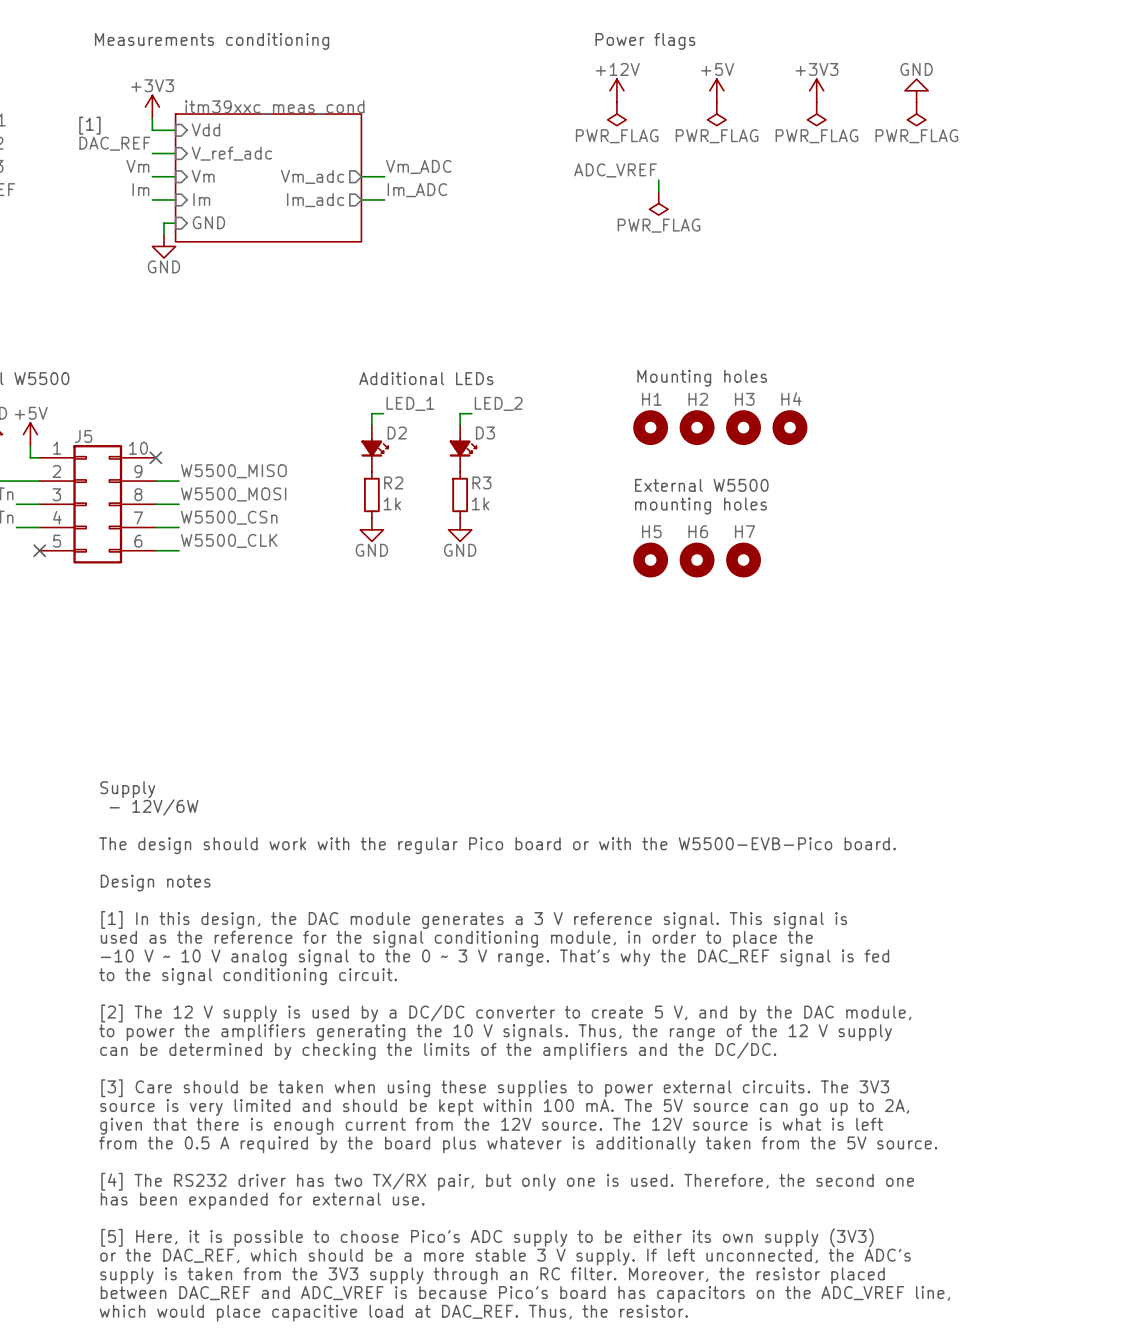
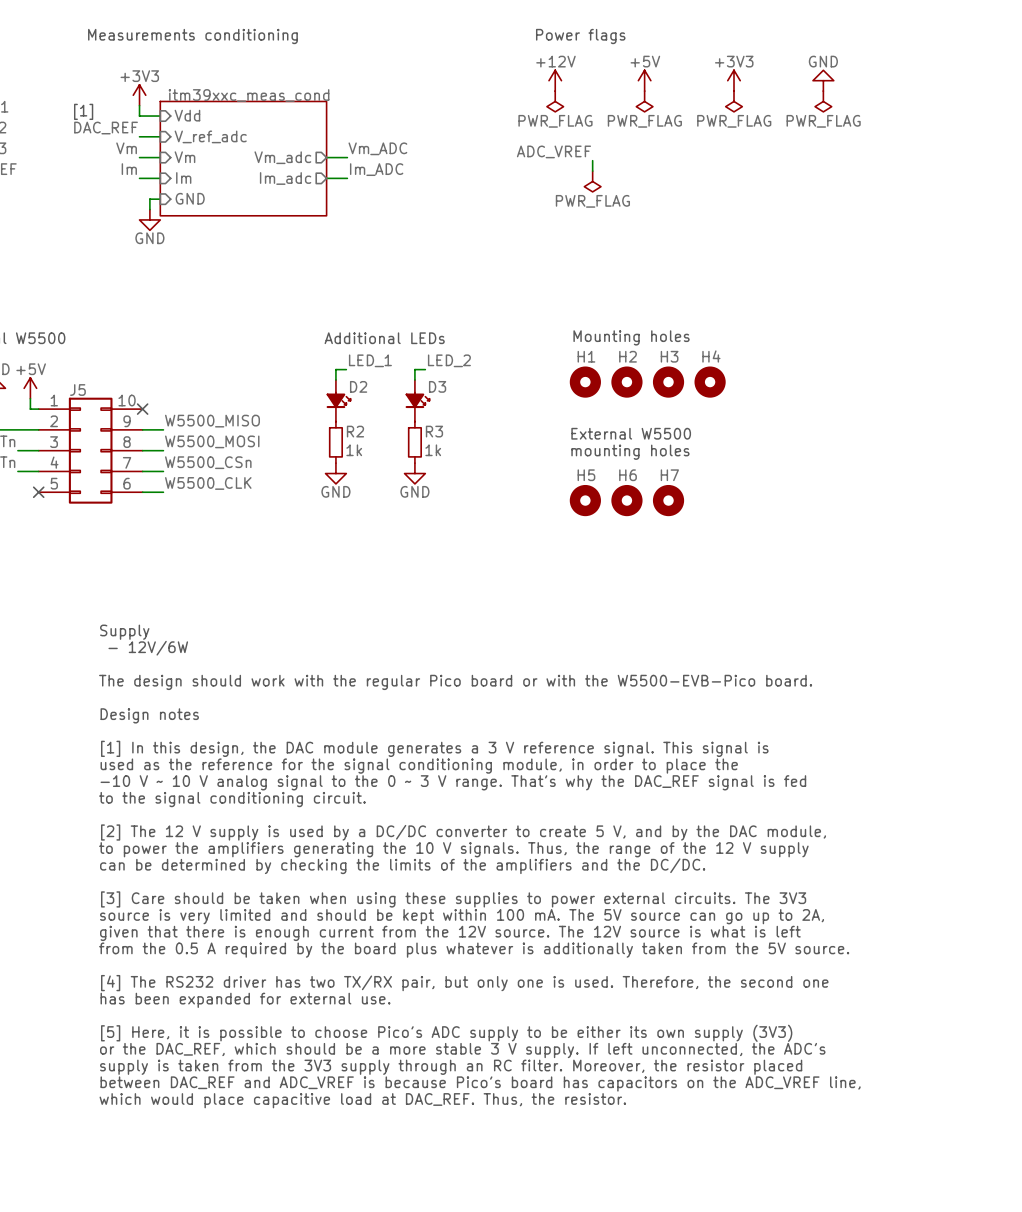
text position: Supply (127, 789) -> Supply (124, 632)
text position: - 12V/6W (154, 807) -> - 12V/6W (148, 648)
text position: The design should work with the regular Pico board or with the W5500-EVB-Pico board. (497, 845) -> The design should work with the regular Pico board or with the W5500-EVB-Pico board. (455, 682)
text position: Design notes (155, 883) -> Design notes (149, 715)
text position: [1] In this design, the DAC module generates a 3 V reference signal. This signal is (474, 919) -> [1] In this design, the DAC module generates a 3 V reference signal. This signal is (434, 748)
text position: used as the reference for the signal conditioning module, in order to place the (456, 939) -> used as the reference for the signal conditioning module, in order to place the (419, 766)
text position: -10 V ~ 10 V analog signal to the 0 ~ 3 V range. That's why the DAC_REF signal is fed (494, 957) -> -10 V ~ 10 V analog signal to the 0 ~ 3 V range. That's why the DAC_REF signal is fed (453, 782)
text position: to the signal conditioning circuit. (248, 976) -> to the signal conditioning circuit. (232, 799)
text position: [2] The 12 V supply is used by a DC/DC converter to create 5 V, and by the DAC module, (506, 1013) -> [2] The 12 V supply is used by a DC/DC converter to create 5 V, and by the DAC module, (463, 832)
text position: to power the amplifiers generating the 10 V signals. Thus, the range of the 12 V supply (495, 1032) -> to power the amplifiers generating the 10 V signals. Thus, the range of the 12 V supply (453, 849)
text position: can be determined by checking the limits of the amplifiers and the DC/DC. (438, 1051) -> can be determined by checking the limits of the amplifiers and the DC/DC. (402, 866)
text position: [3] Care should be taken when using these supplies to power external circuits. The 3V3 (495, 1088) -> [3] Care should be taken when using these supplies to power external circuits. The 3V3 (453, 899)
text position: source is very limited and should be kept within 100 mA. The 5V source can go up to 2A, (504, 1107) -> source is very limited and should be kept within 100 mA. The 5V source can go up to 2A, (462, 916)
text position: given that there is enough current from the 12V source. The 12V source is what is left (491, 1126) -> given that there is enough current from the 12V source. The 12V source is what is left (450, 933)
text position: from the 0.5 A required by the board plus whatever is additionally taken from the 5V source. (518, 1144) -> from the 0.5 A required by the board plus whatever is additionally taken from the 5V source. (474, 950)
text position: [4] The RS232 driver has two TX/RX pair, but only one is used. Therefore, the second one (507, 1181) -> [4] The RS232 driver has two TX/RX pair, but only one is used. Therefore, the second one (464, 983)
text position: has been expanded for external use. (262, 1200) -> has been expanded for external use. (245, 1000)
text position: [5] Here, it is possible to choose Pico's ADC supply to be either its own supply (3V3) (487, 1237) -> [5] Here, it is possible to choose Pico's ADC supply to be either its own supply (3V3) (446, 1033)
text position: or the DAC_REF, which should be a more stable 3 V supply. If left unconnected, the ADC's (505, 1257) -> or the DAC_REF, which should be a more stable 3 V supply. If left unconnected, the ADC's (462, 1050)
text position: supply is taken from the 3V3 supply through an RC filter. Moreover, the resistor placed (492, 1275) -> supply is taken from the 3V3 supply through an RC filter. Moreover, the resistor placed (451, 1067)
text position: between DAC_REF and ADC_VREF is because Pico's board has capacitors on the ADC_VREF line, (525, 1294) -> between DAC_REF and ADC_VREF is because Pico's board has capacitors on the ADC_VREF line, (480, 1083)
text position: which would place capacitive load at DAC_REF. Thus, the resistor. (393, 1313) -> which would place capacitive load at DAC_REF. Thus, the resistor. (362, 1100)

